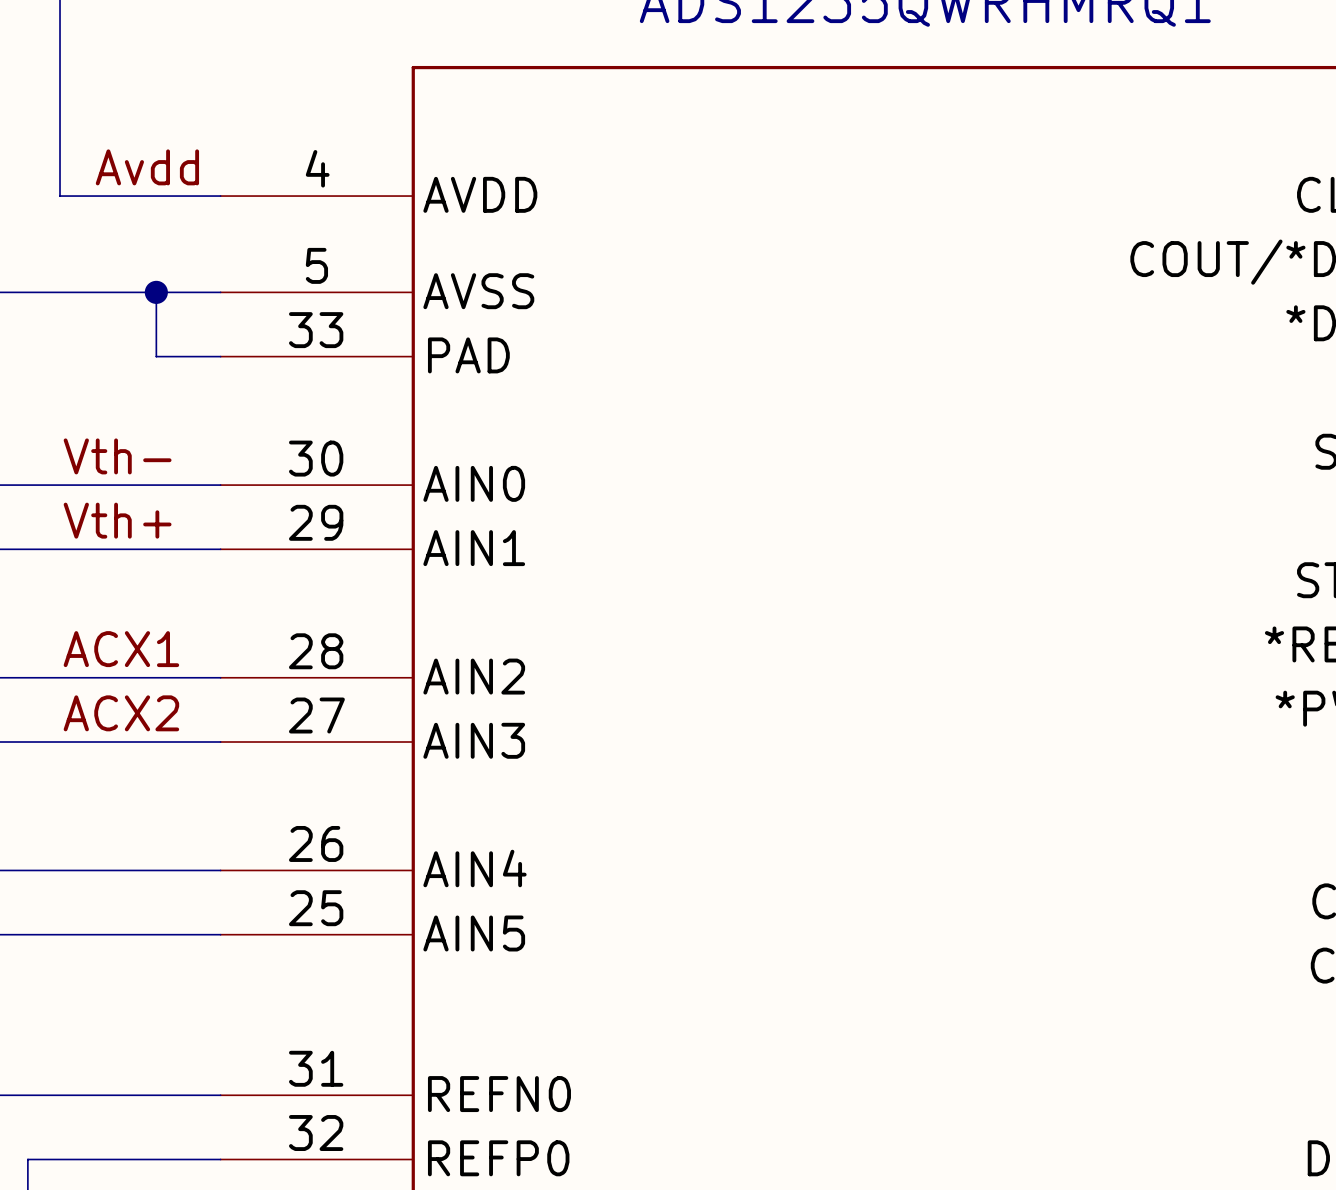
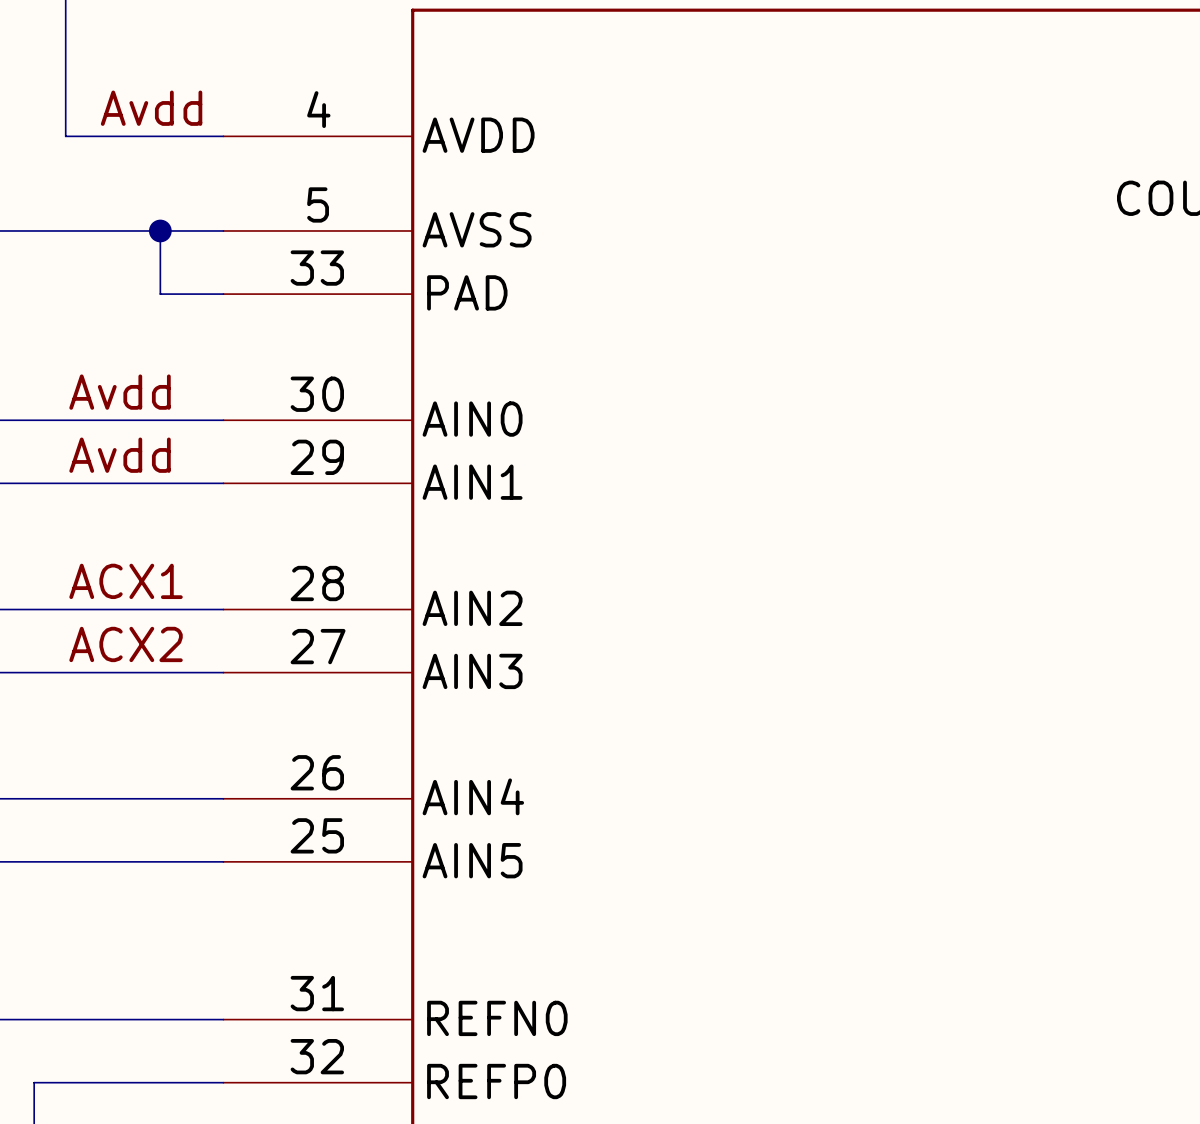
label: Vth- (117, 456) -> Avdd (120, 392)
label: Vth+ (117, 520) -> Avdd (120, 455)

